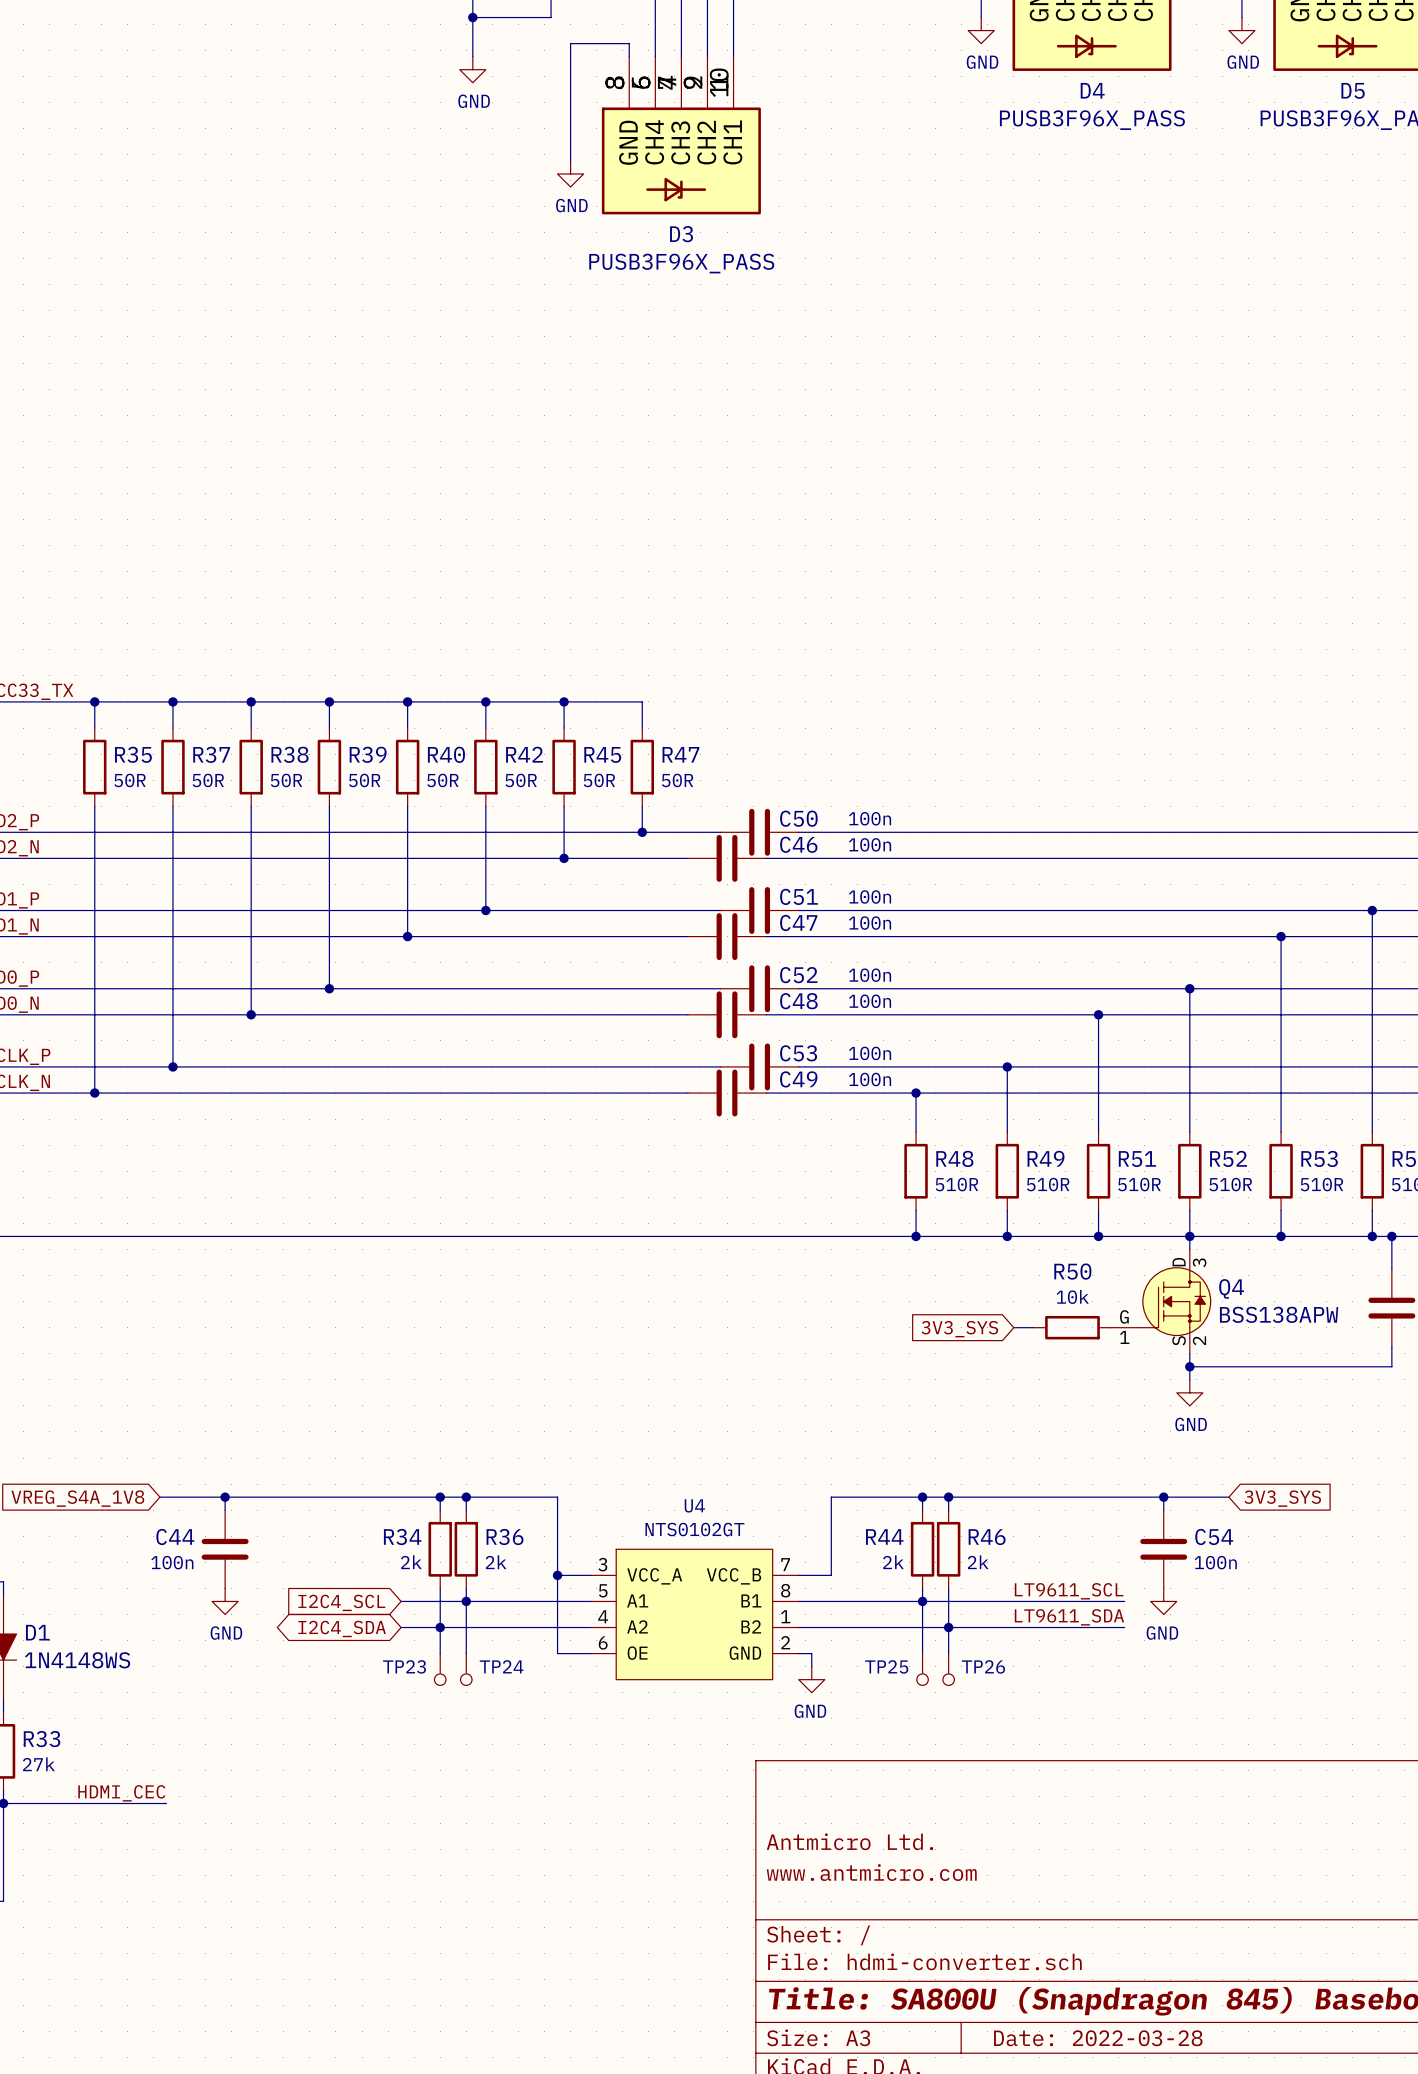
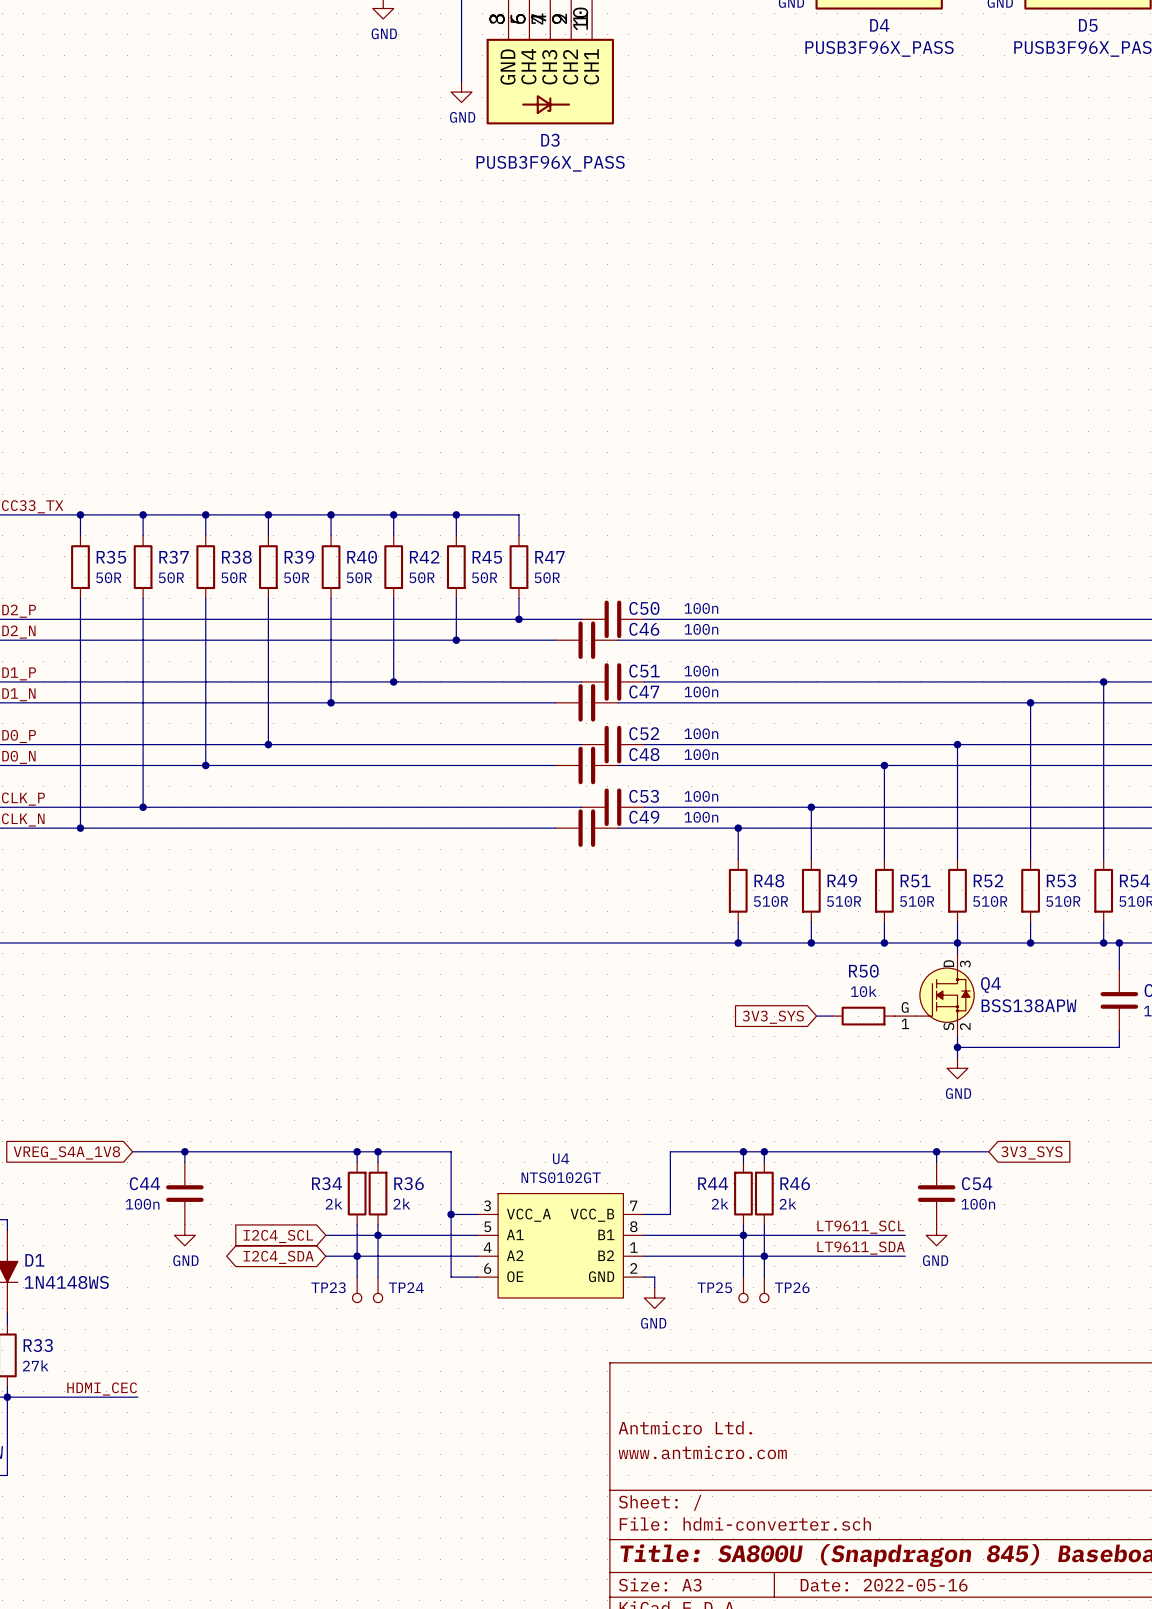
title block: Date: 2022-03-28 (1098, 2038) -> Date: 2022-05-16 (884, 1585)

